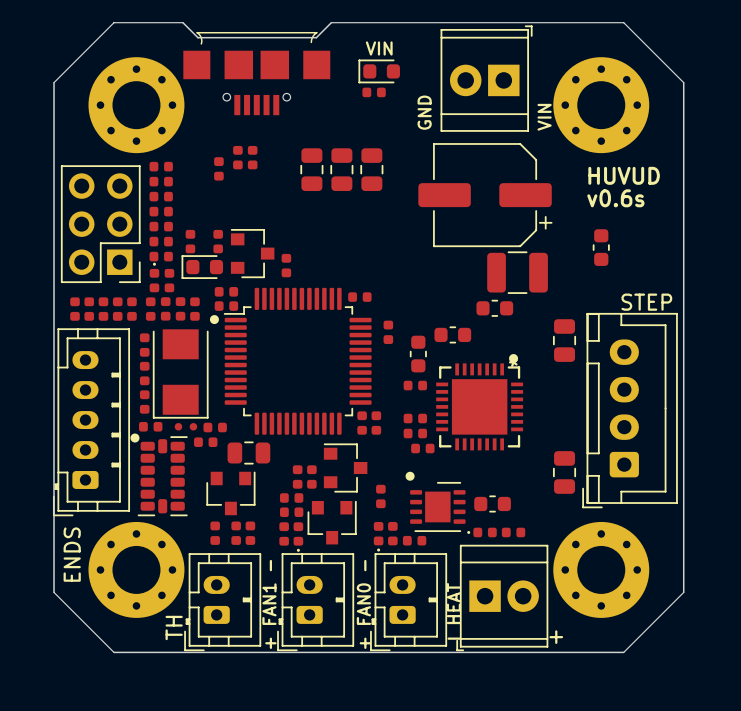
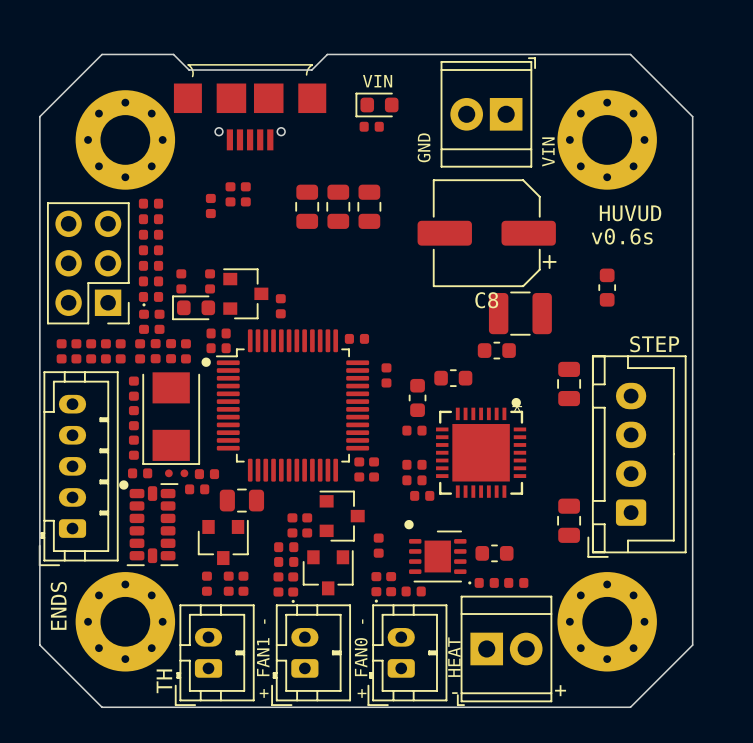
C8 name: none -> C8 (486, 300)

